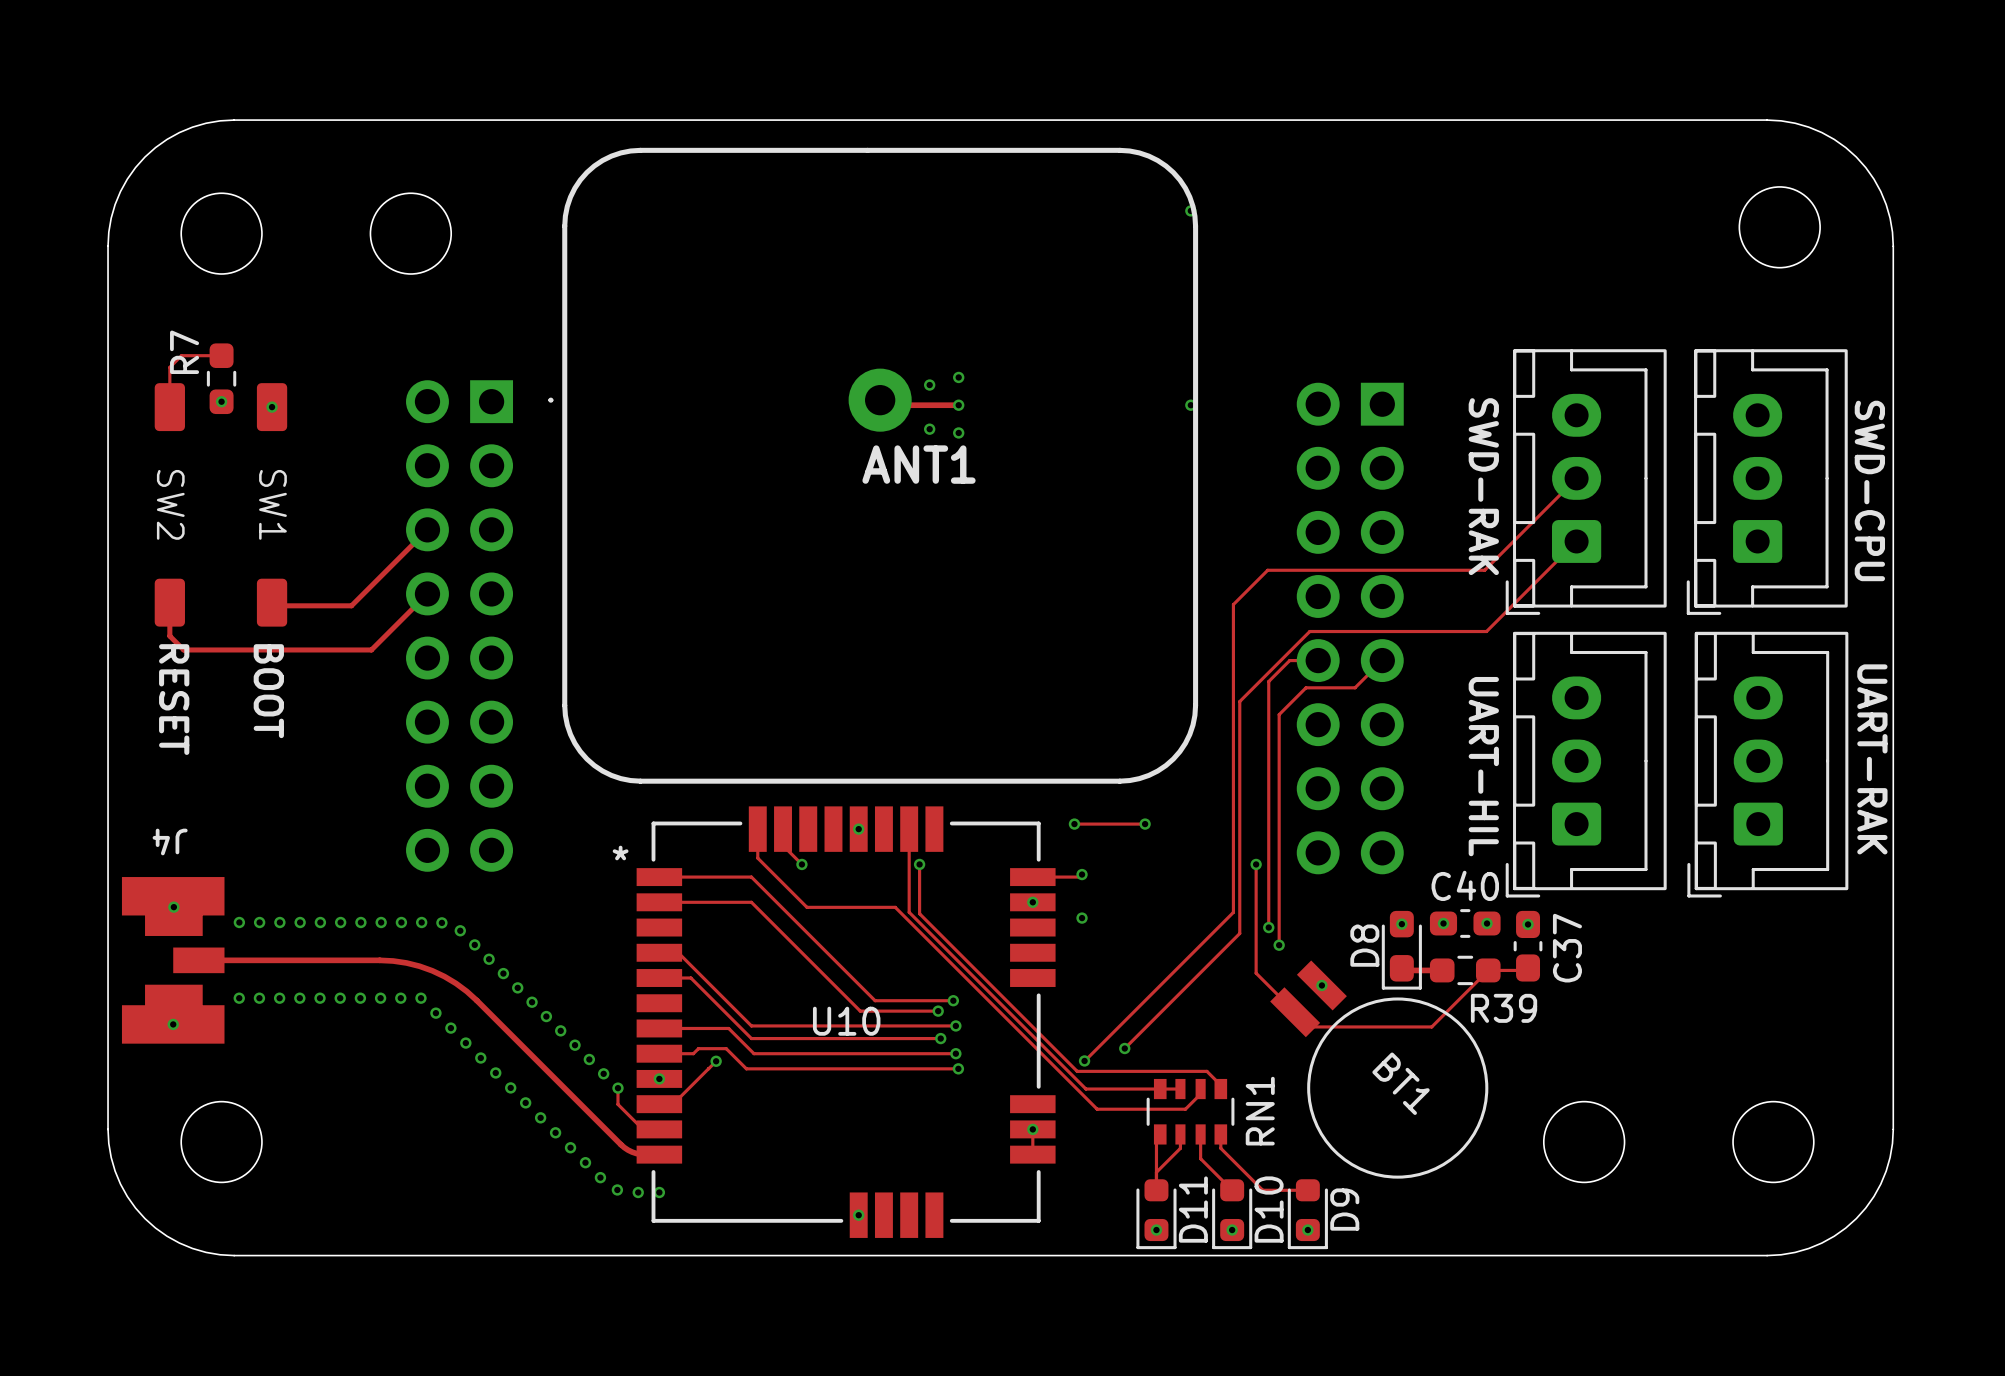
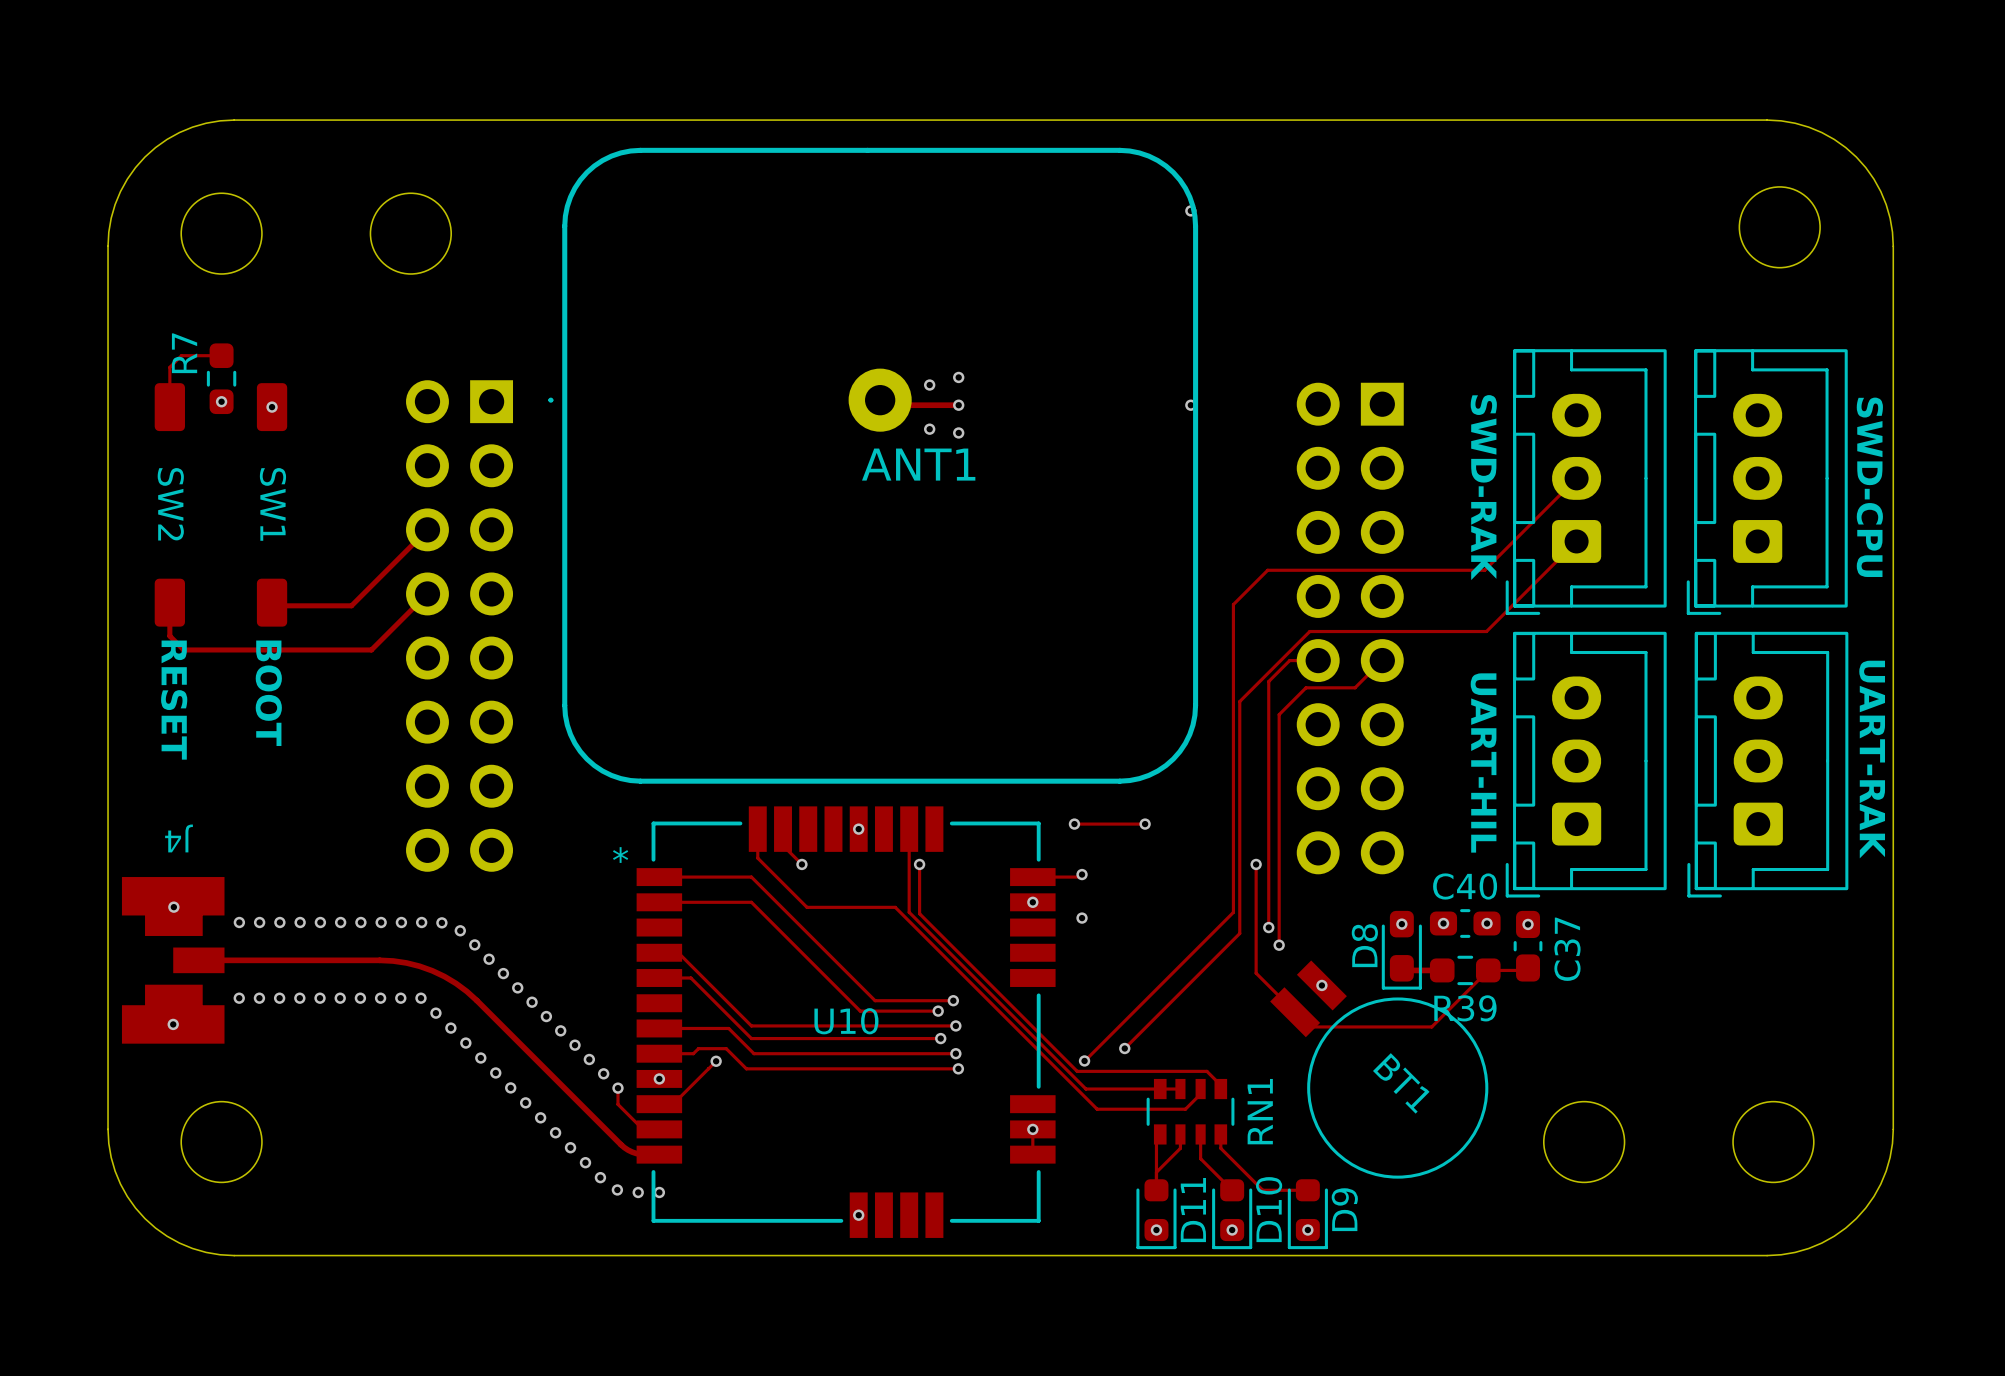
R39 name position: R39 (1504, 1008) -> R39 (1465, 1008)

